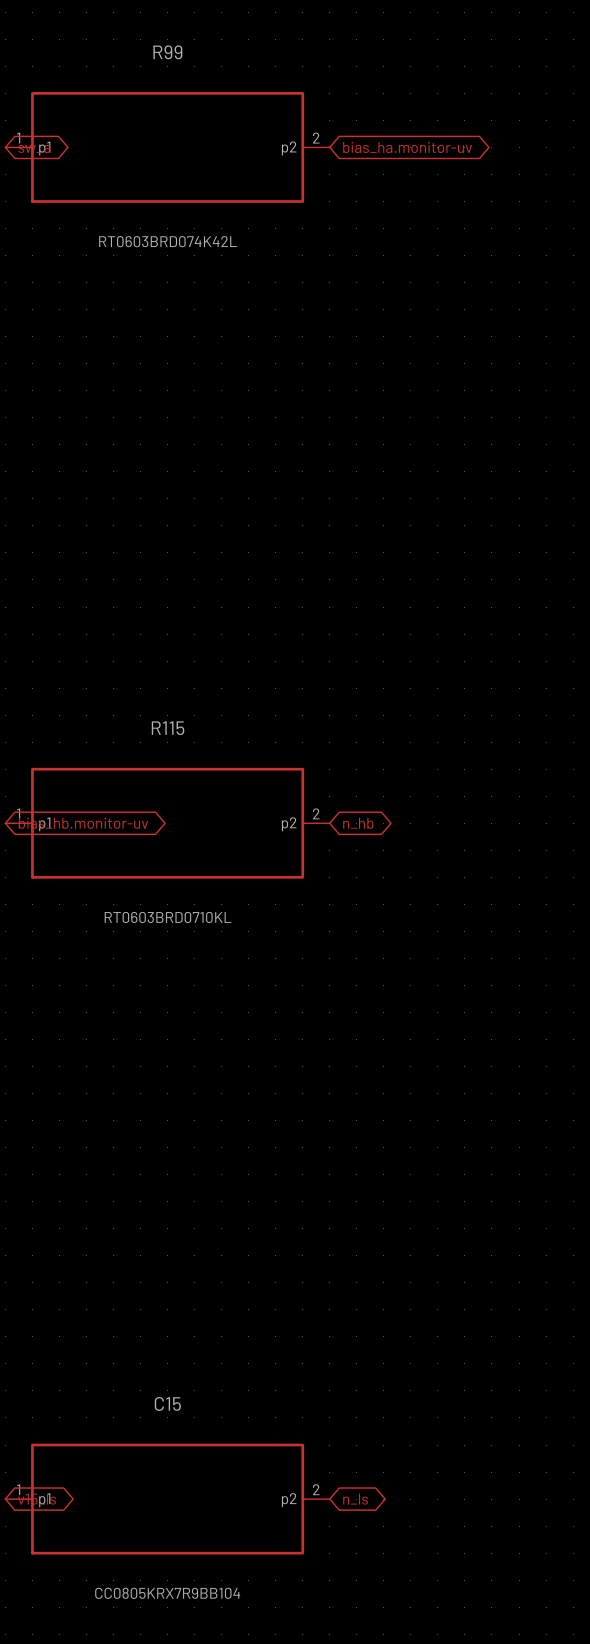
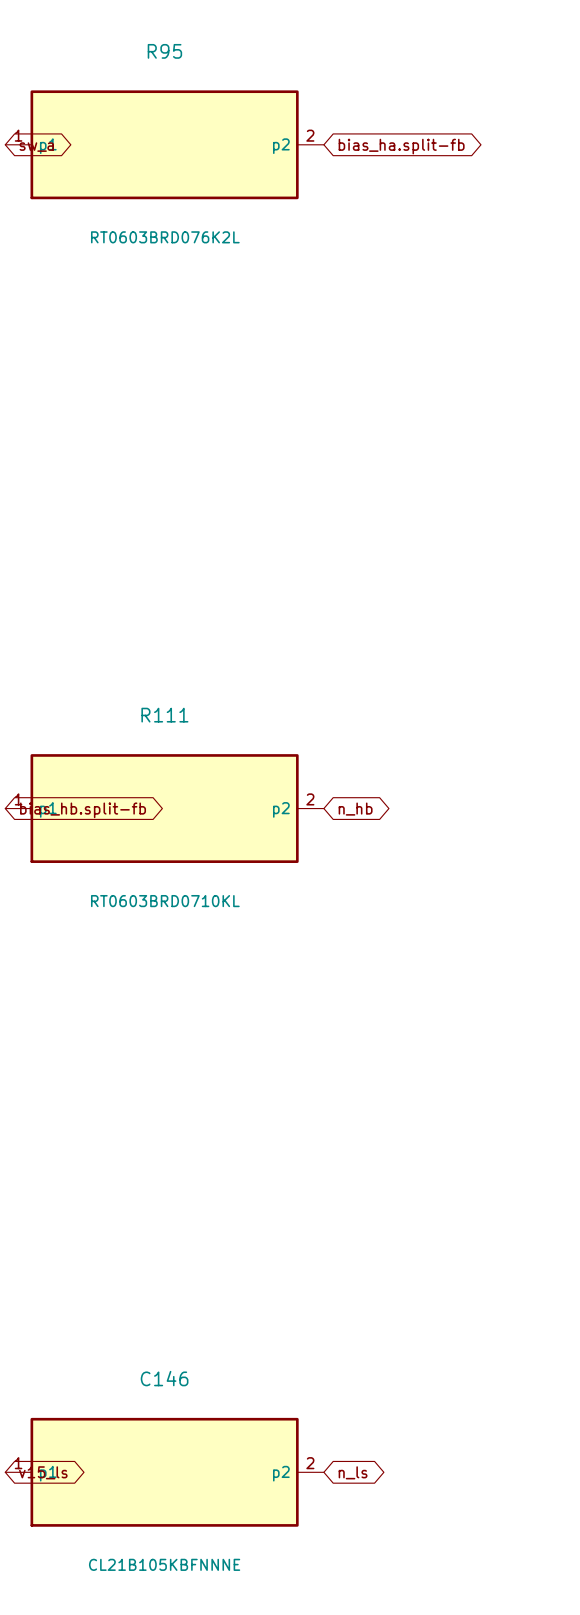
R99 name: R99 (167, 52) -> R95 (164, 51)
global label: bias_ha.monitor-uv (407, 147) -> bias_ha.split-fb (401, 146)
R99 value: RT0603BRD074K42L (168, 241) -> RT0603BRD076K2L (165, 237)
R115 name: R115 (168, 728) -> R111 (164, 715)
global label: bias_hb.monitor-uv (83, 823) -> bias_hb.split-fb (83, 810)
C15 name: C15 (167, 1403) -> C146 (164, 1378)
C15 value: CC0805KRX7R9BB104 (167, 1593) -> CL21B105KBFNNNE (164, 1564)

